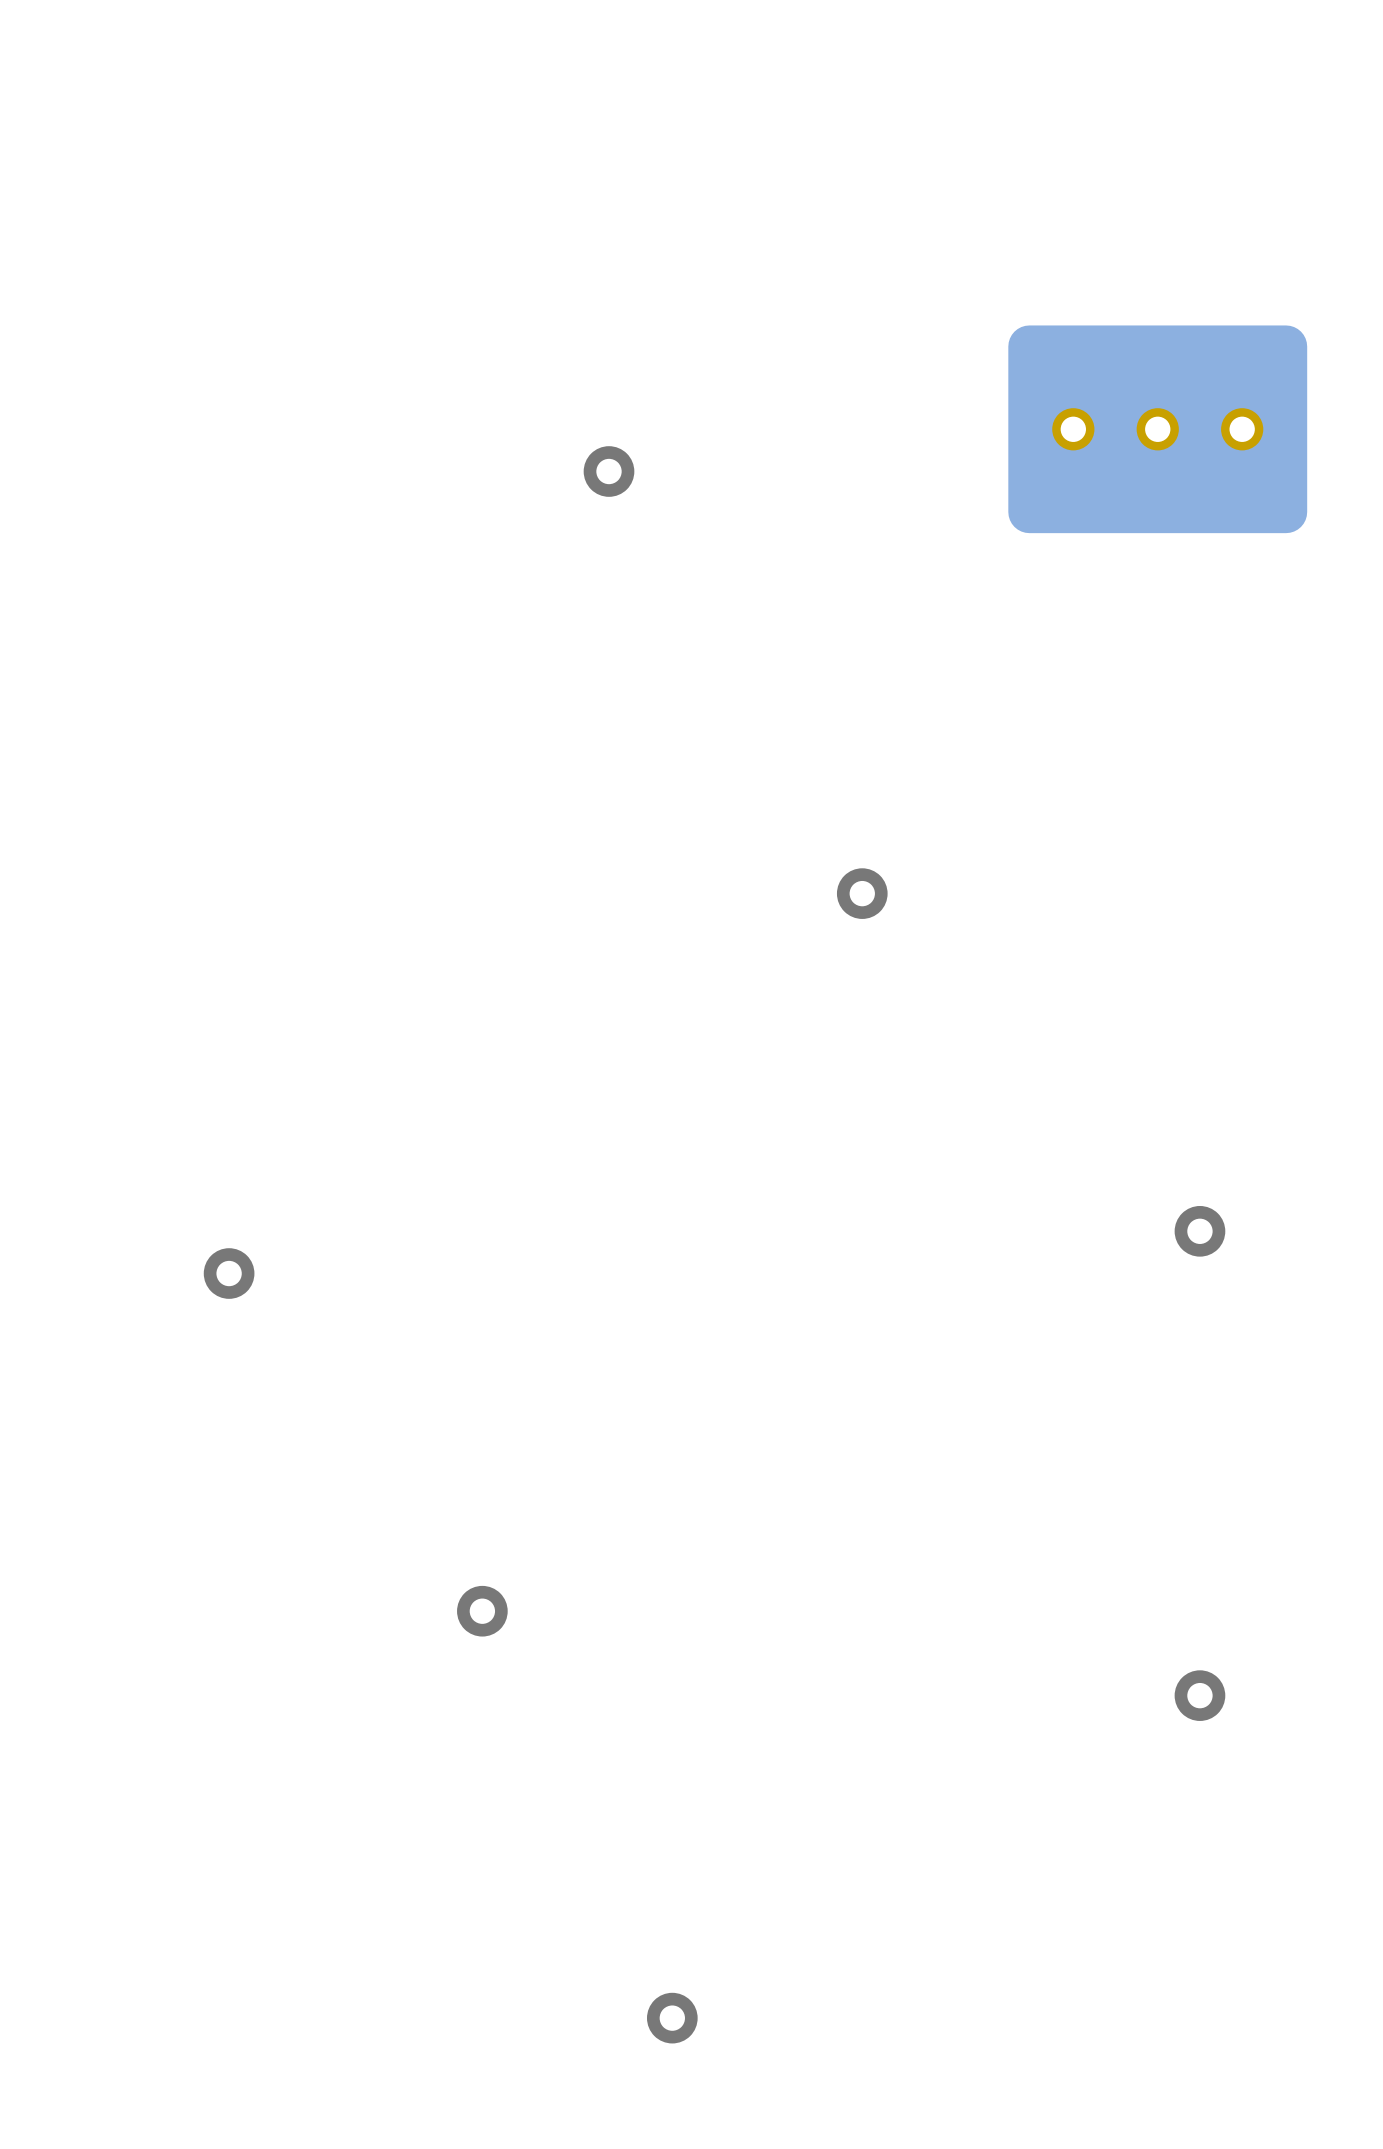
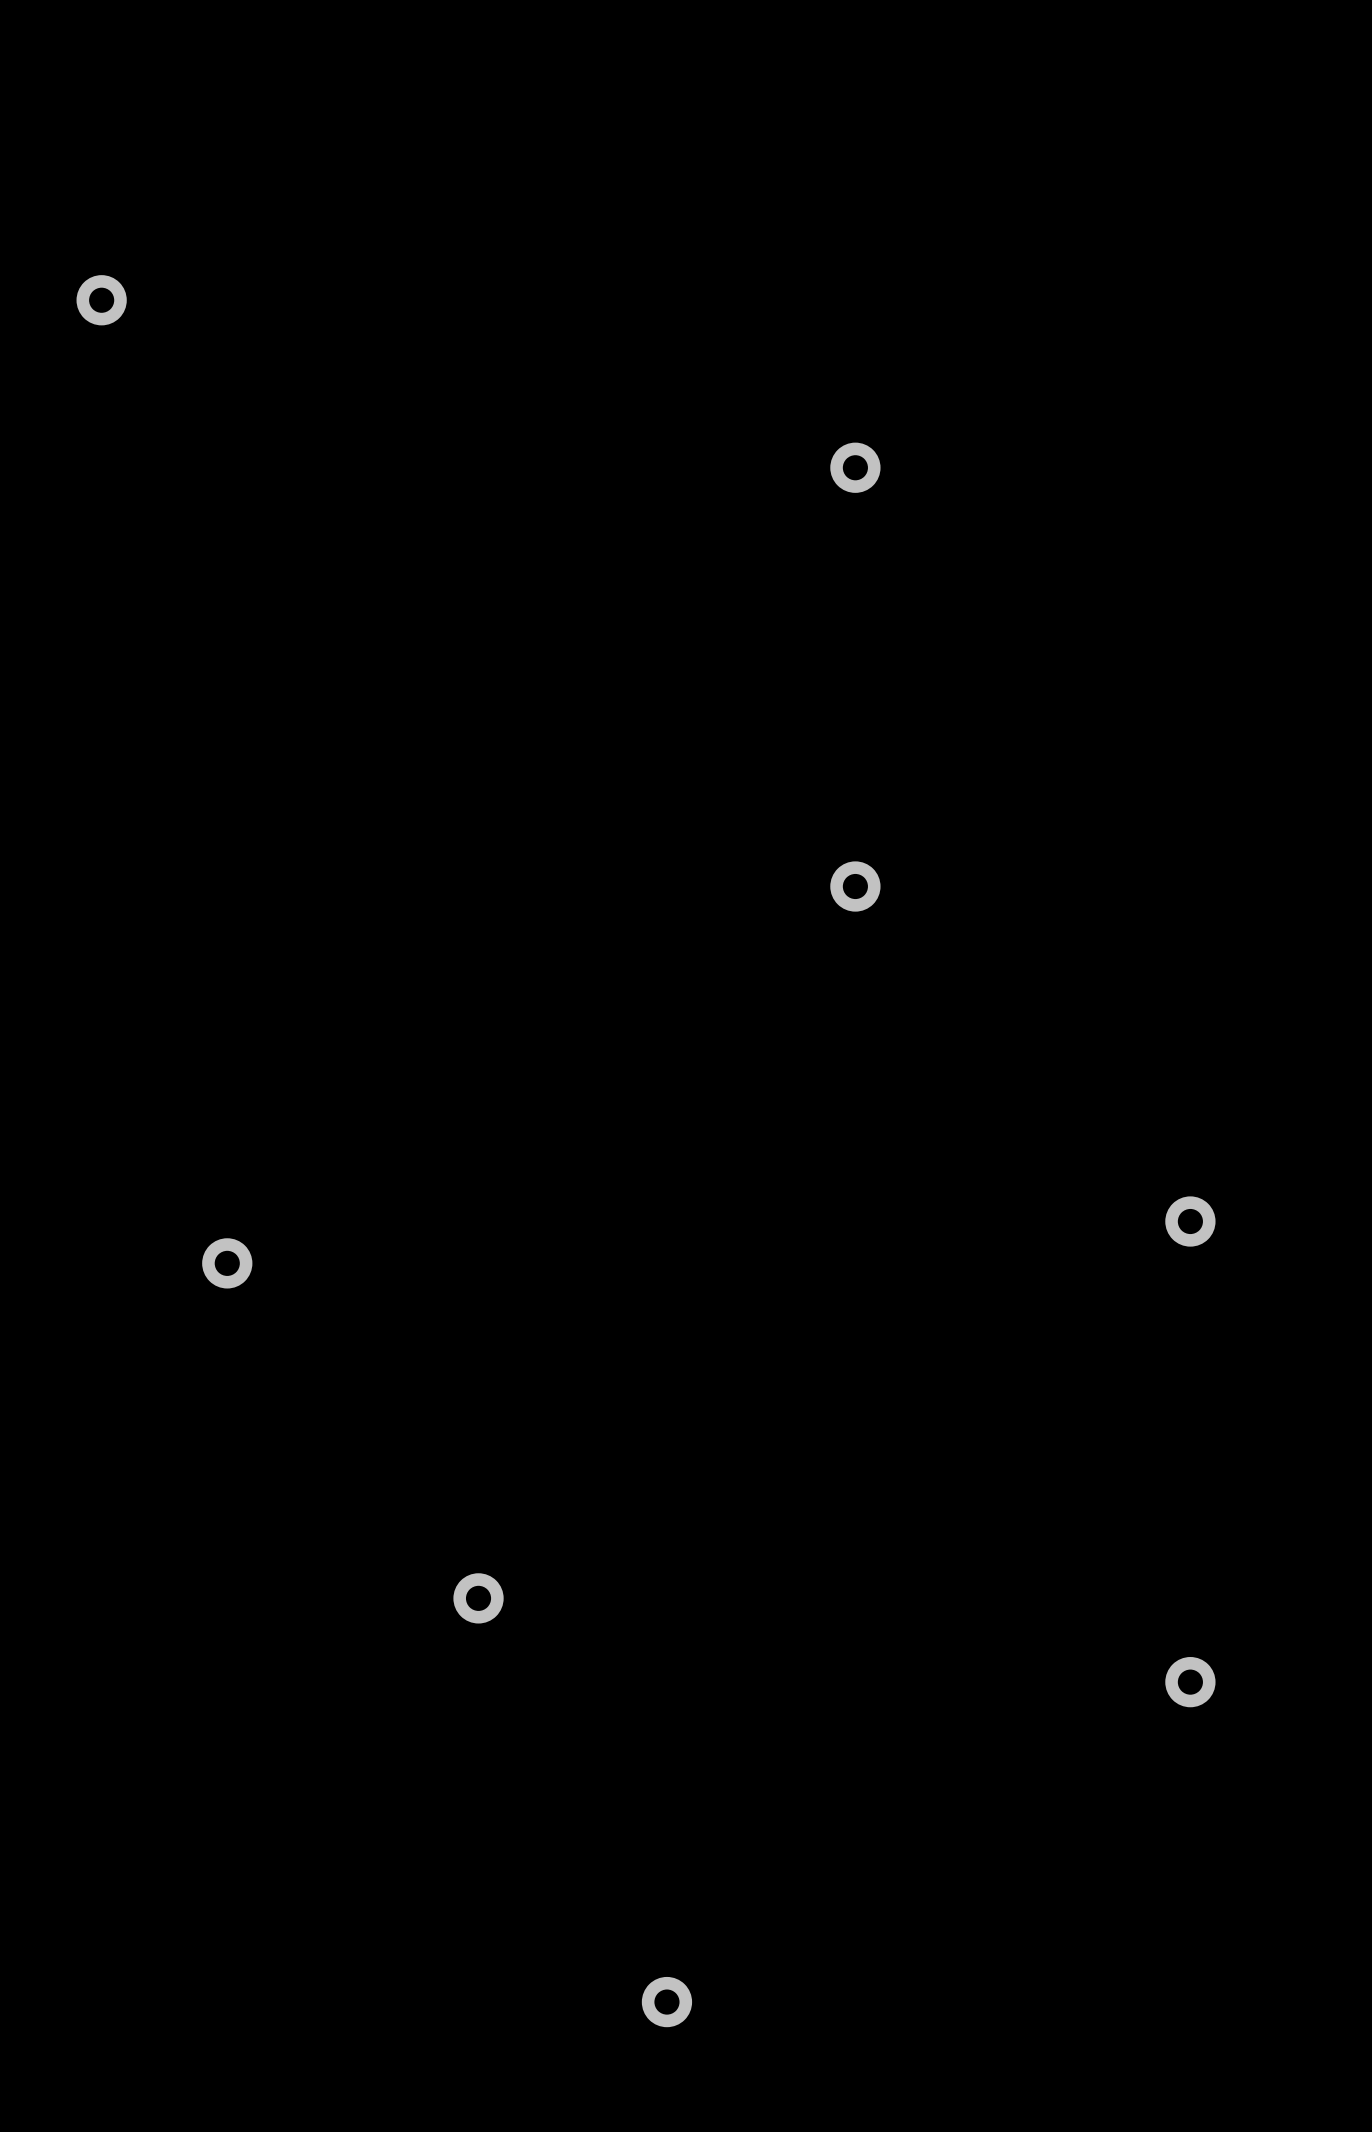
via: none -> (101, 300)
part: (1157, 429) -> none
via position: (609, 471) -> (855, 467)

